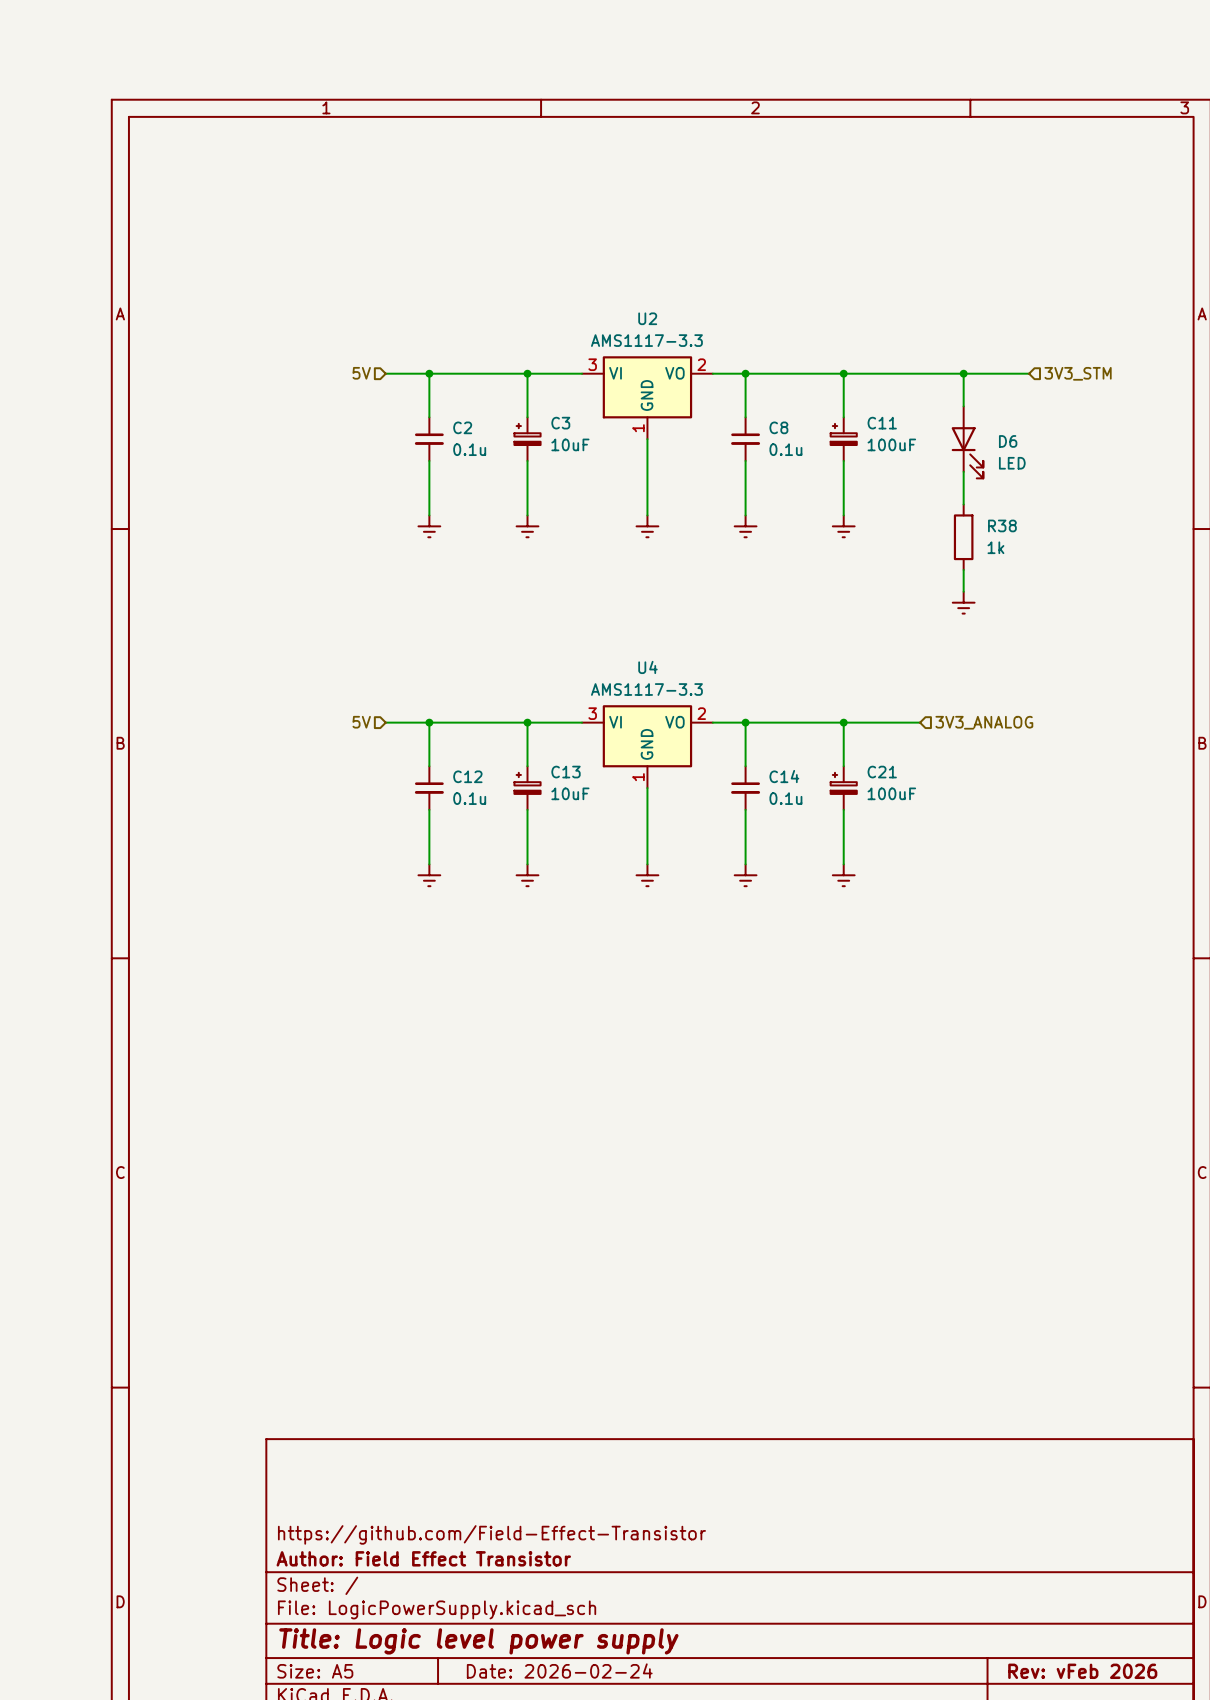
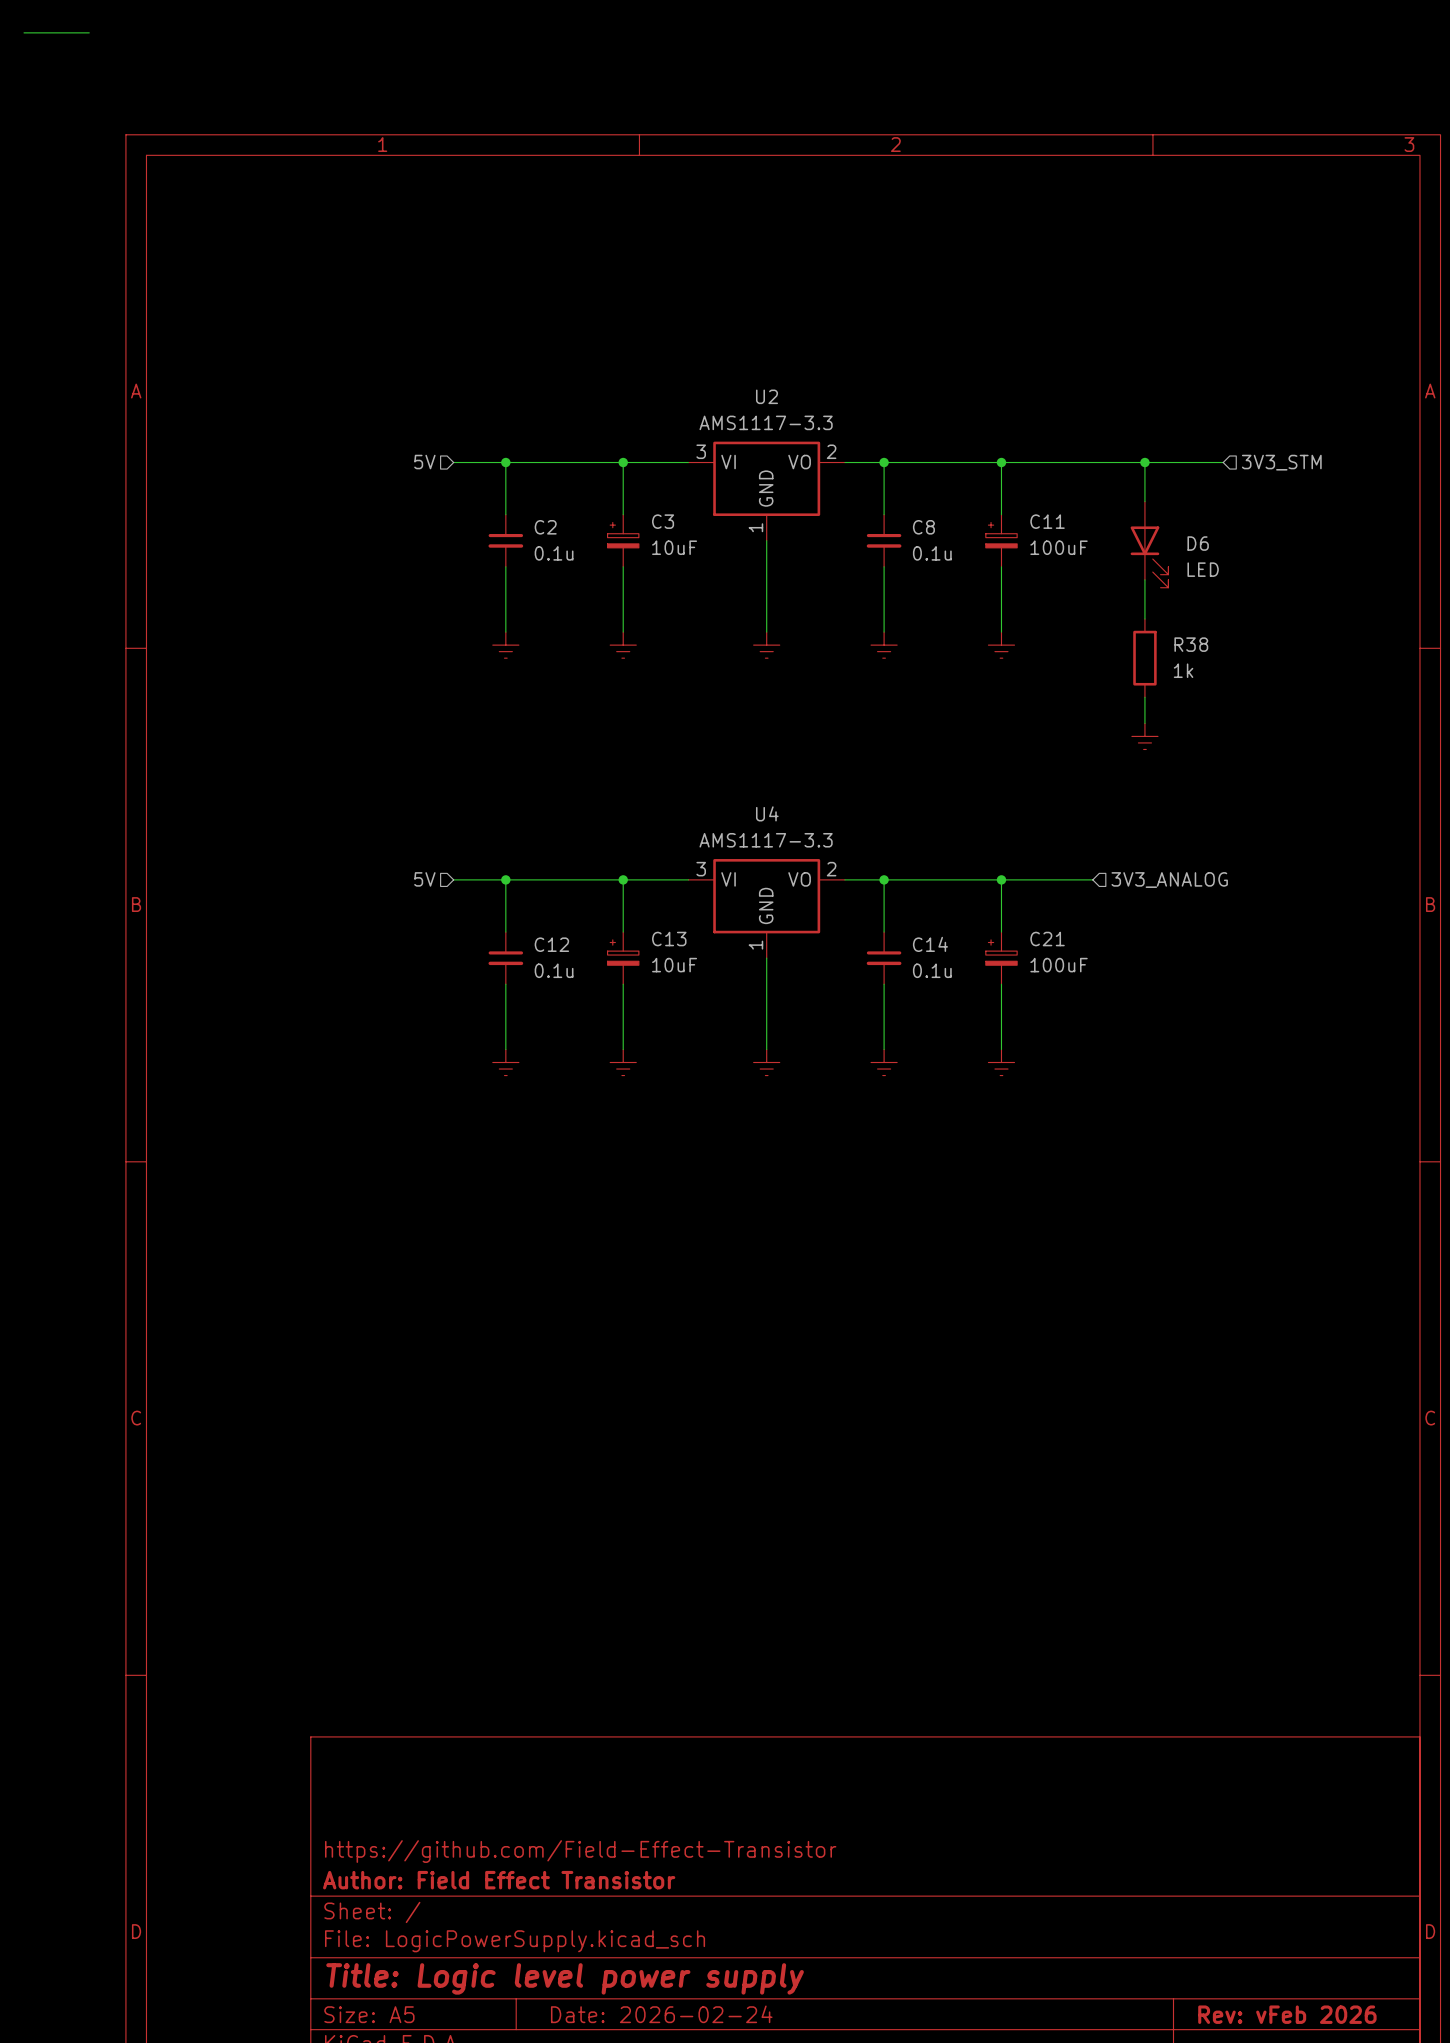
wire: none -> (24, 32) (89, 32)

